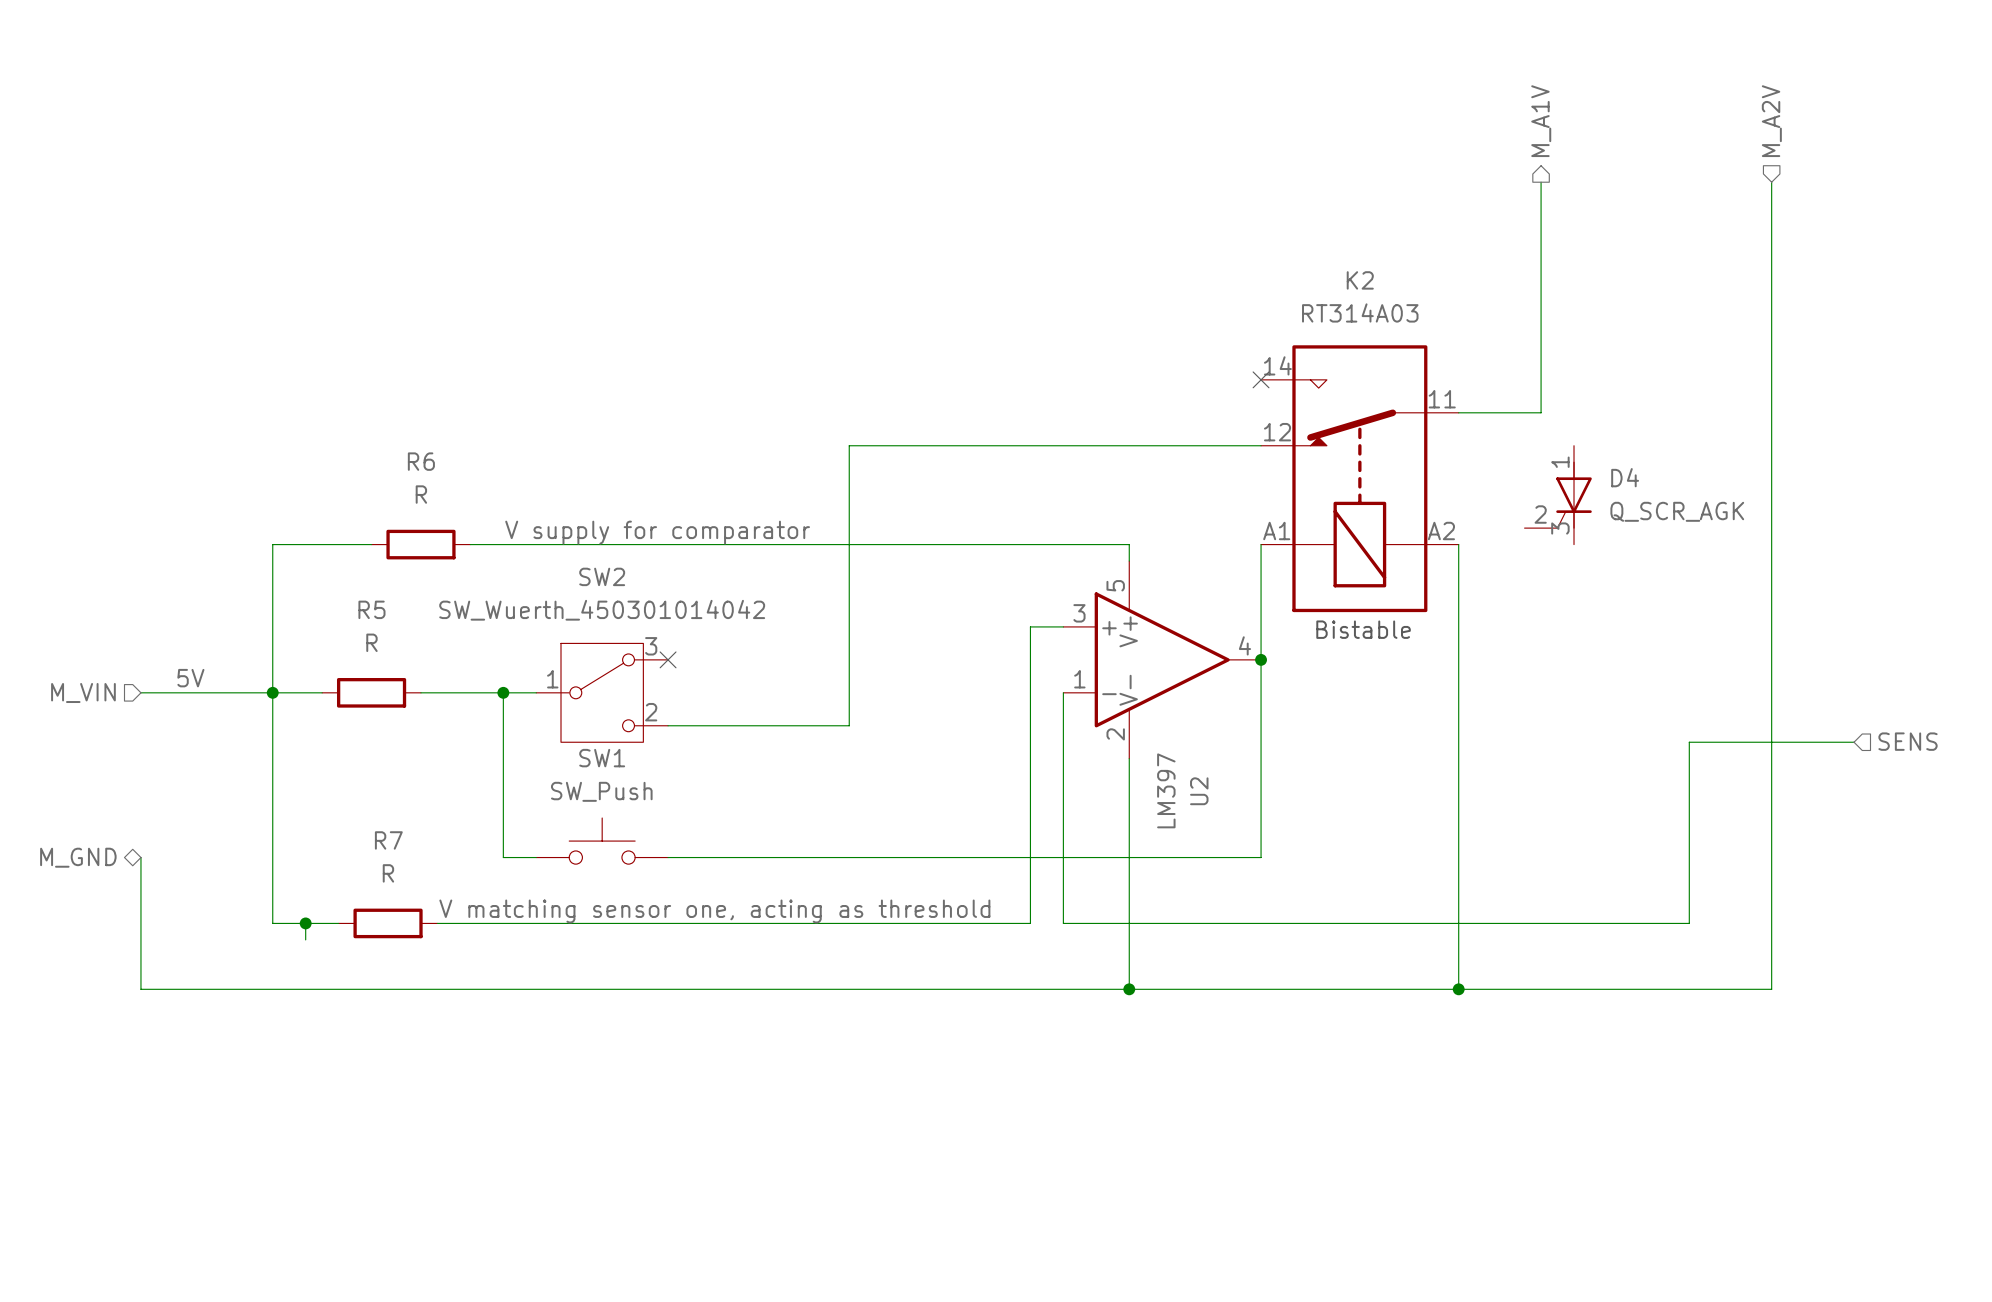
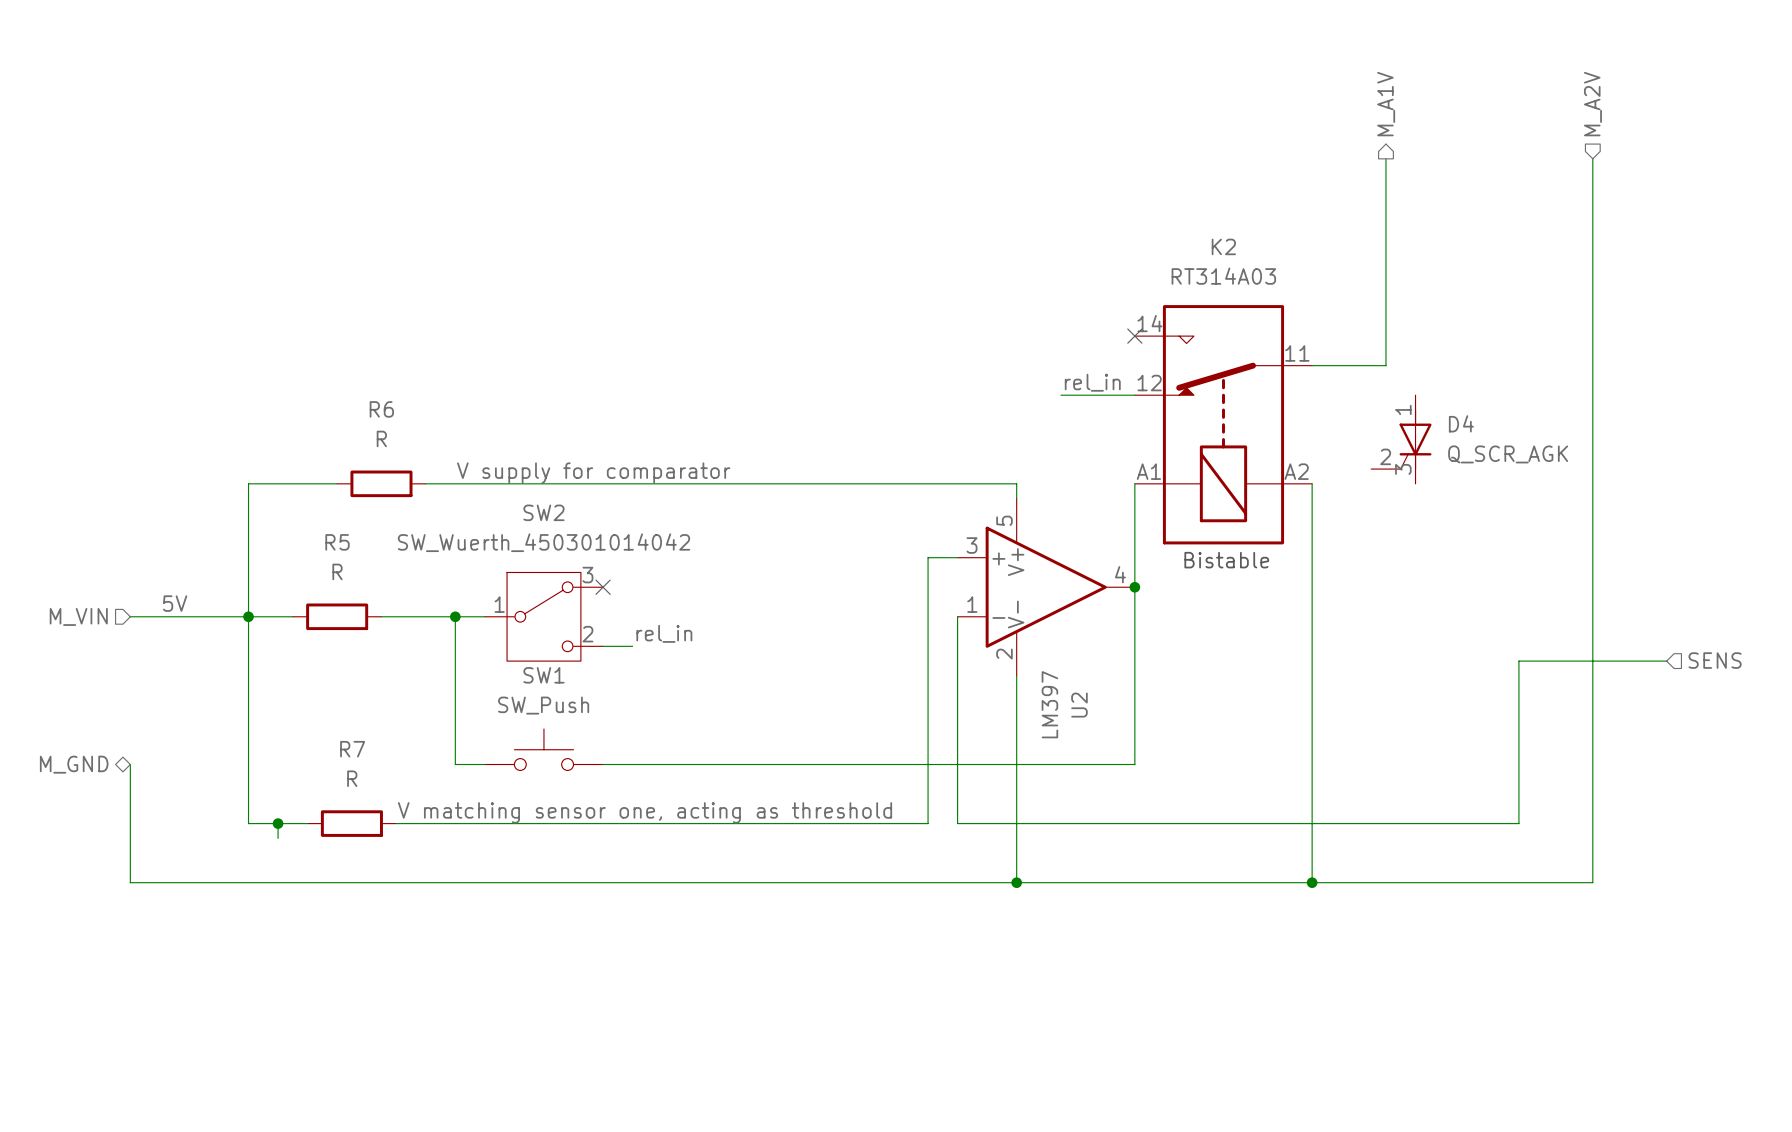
label: none -> rel_in (1092, 382)
wire: (1178, 445) (849, 445) (849, 725) (701, 725) -> none
label: none -> rel_in (664, 633)

